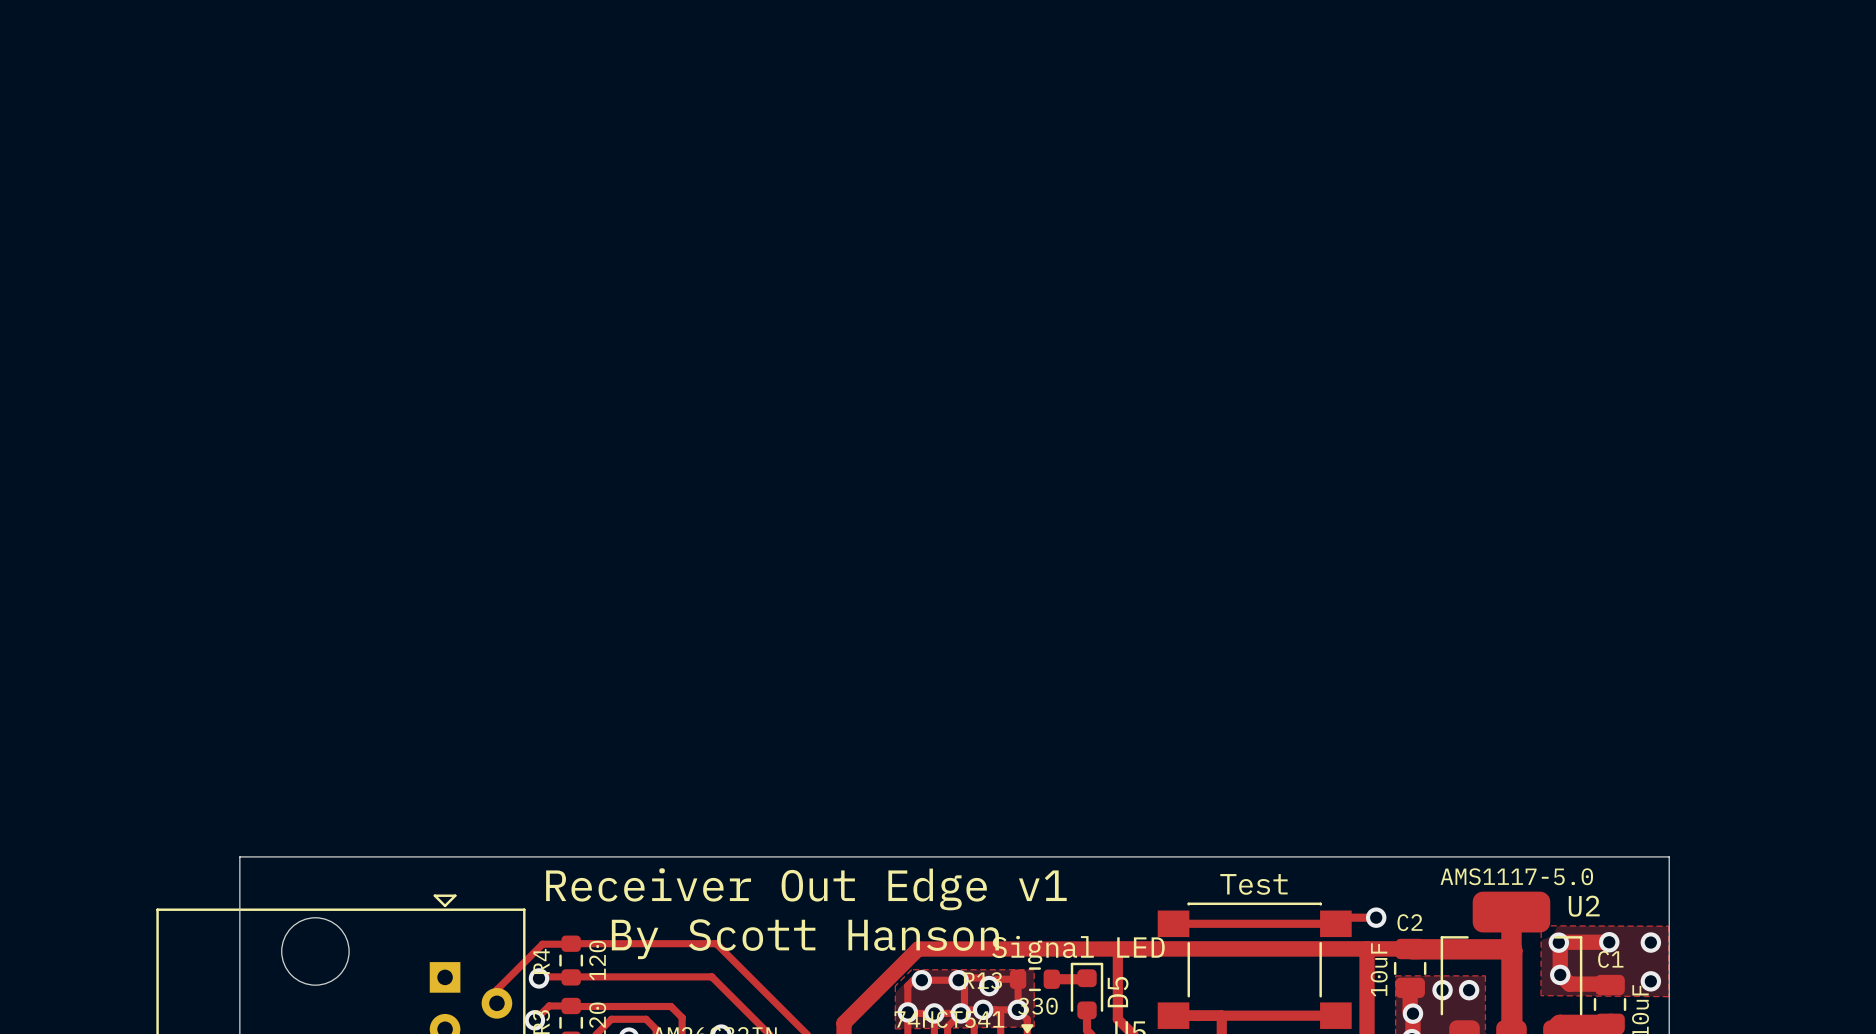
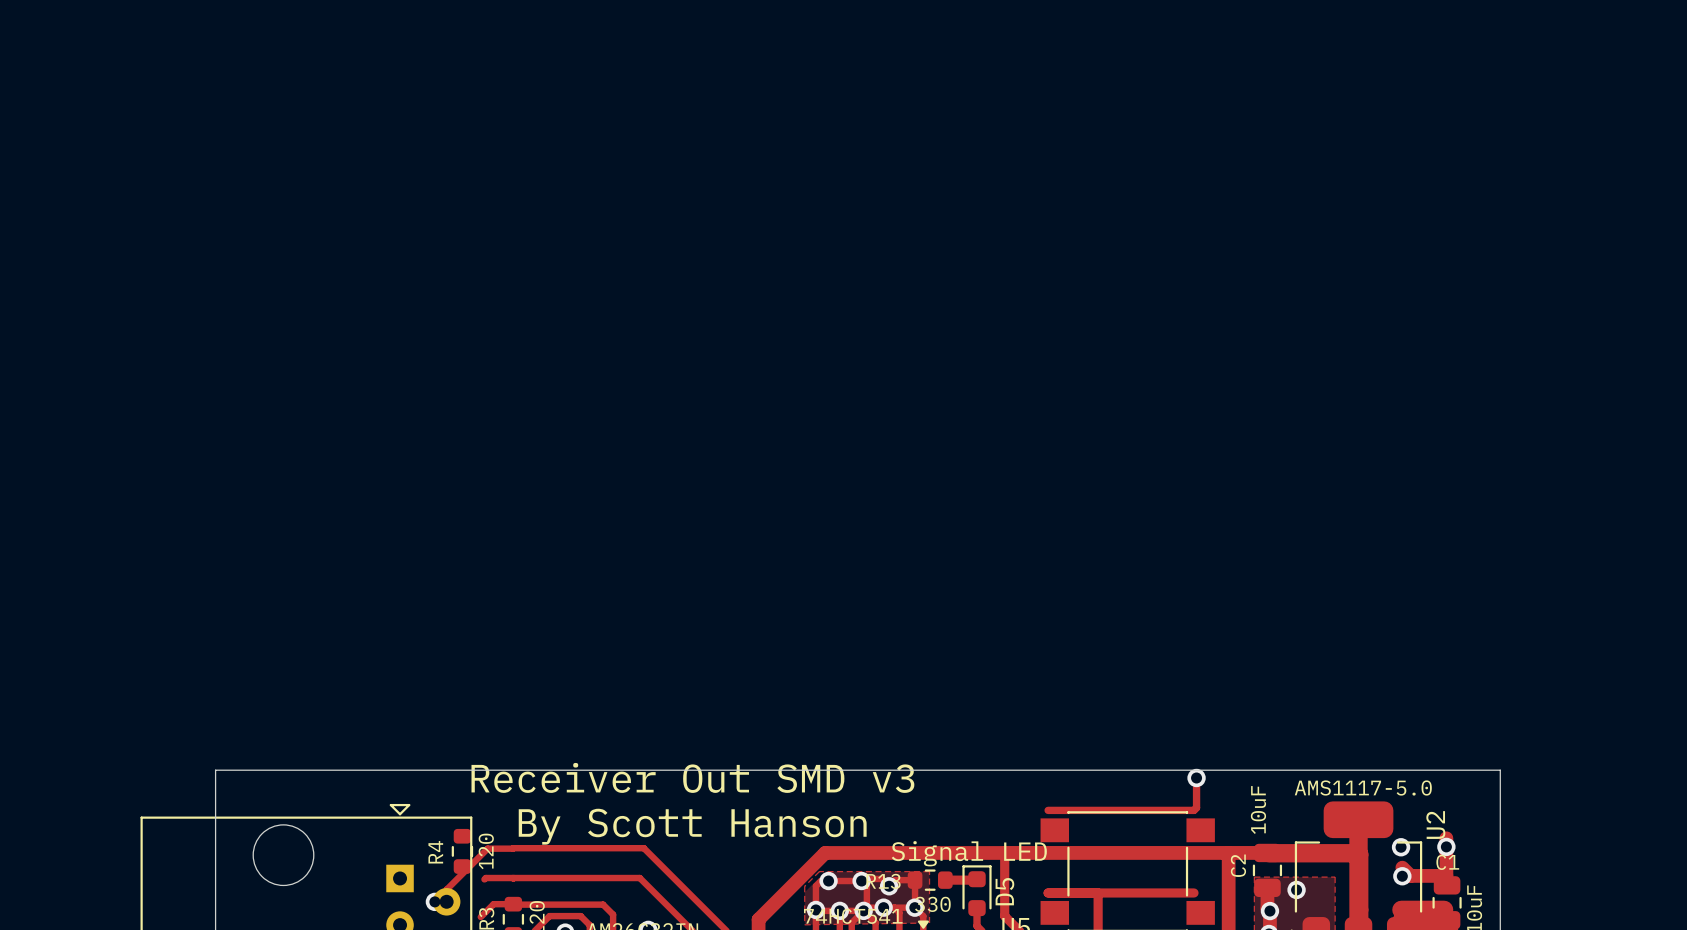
track: none -> (1196, 778) (1196, 807) (1194, 810) (1048, 810)
part value: Test (1253, 884) -> none
text: Receiver Out Edge v1 (806, 889) -> Receiver Out SMD v3 (692, 777)
U2 name rotation: 0° (1584, 906) -> 90° counterclockwise (1435, 825)
track: (1376, 917) (1342, 917) (1335, 923) (1173, 923) -> none
via position: (1376, 917) -> (1196, 778)
C2 name rotation: 0° (1409, 922) -> 90° counterclockwise (1238, 865)
C2 name position: C2 (1409, 922) -> C2 (1238, 865)
zone outline: (1541, 925) (1540, 995) (1668, 996) (1668, 926) (1541, 925) -> none
track: none -> (1446, 838) (1446, 875) (1410, 875) (1402, 867)
text position: By Scott Hanson (805, 939) -> By Scott Hanson (692, 826)
track: (1609, 942) (1558, 942) (1560, 974) (1569, 984) (1601, 984) -> none
via: (1650, 942) -> none
R4 position: (571, 960) -> (462, 851)
C2 value position: 10uF (1379, 969) -> 10uF (1258, 810)
via: (539, 978) -> none
via: (1650, 981) -> none
via: (1469, 990) -> none
track: none -> (1098, 892) (1098, 912)
via: none -> (434, 901)
track: none -> (1401, 909) (1444, 909)
track: (1173, 1015) (1335, 1015) -> (1048, 892) (1194, 892)
via: (534, 1020) -> none

